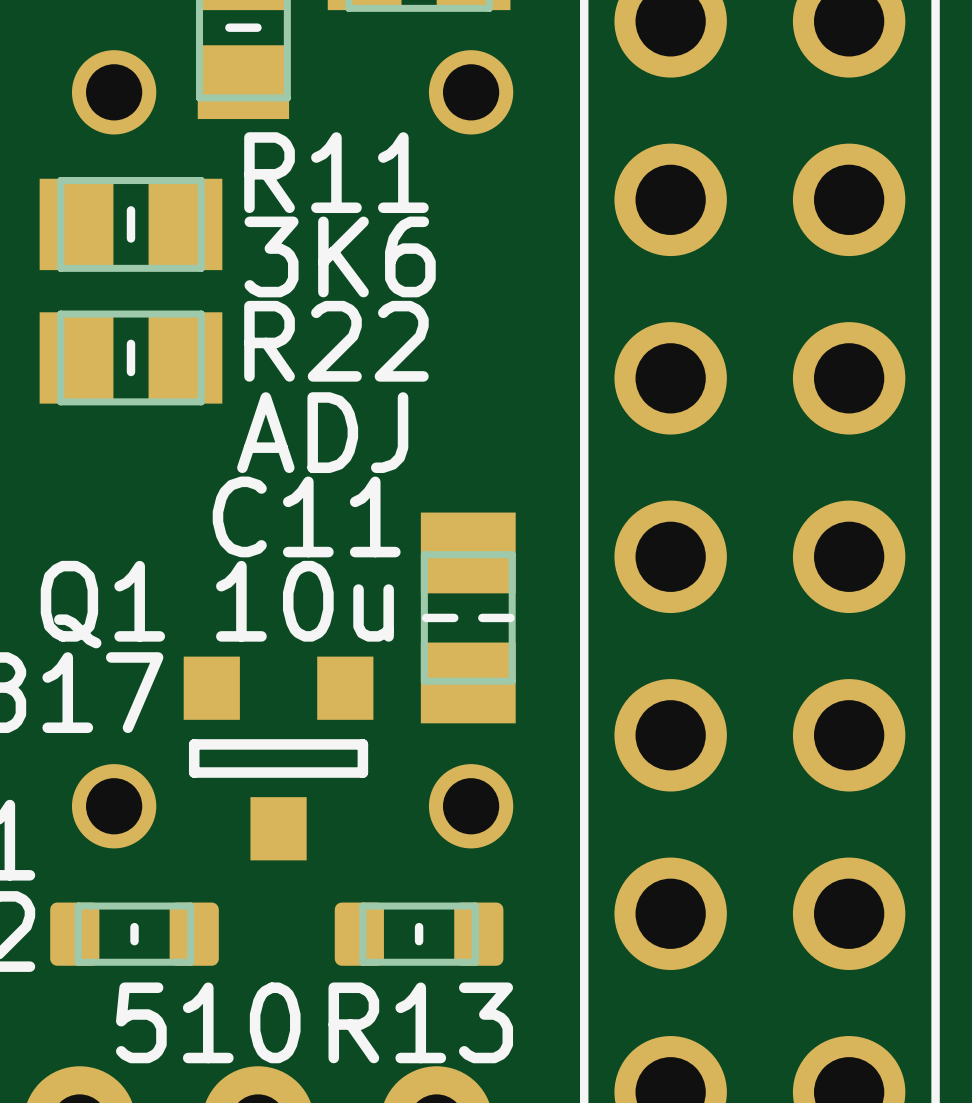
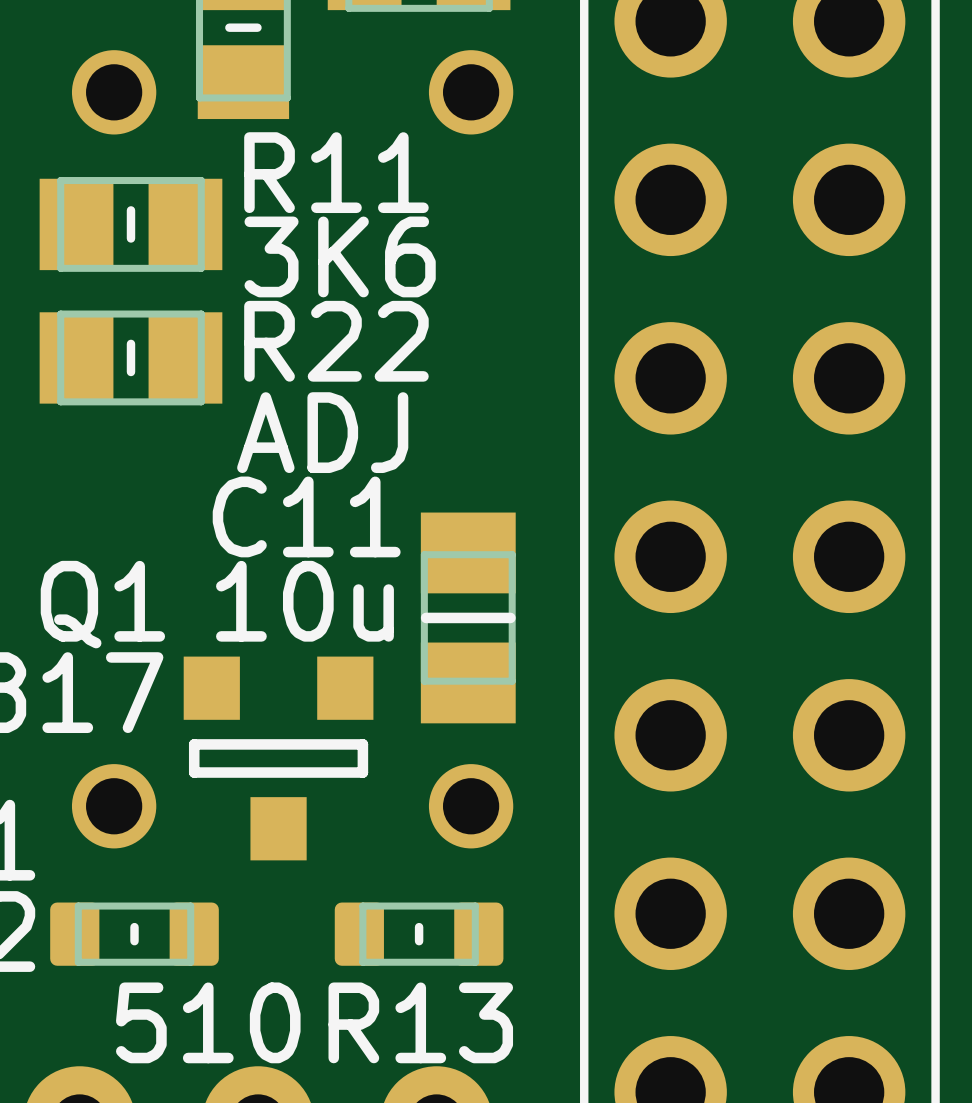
C11 footprint: [420, 512, 516, 724] -> [420, 512, 516, 724]

